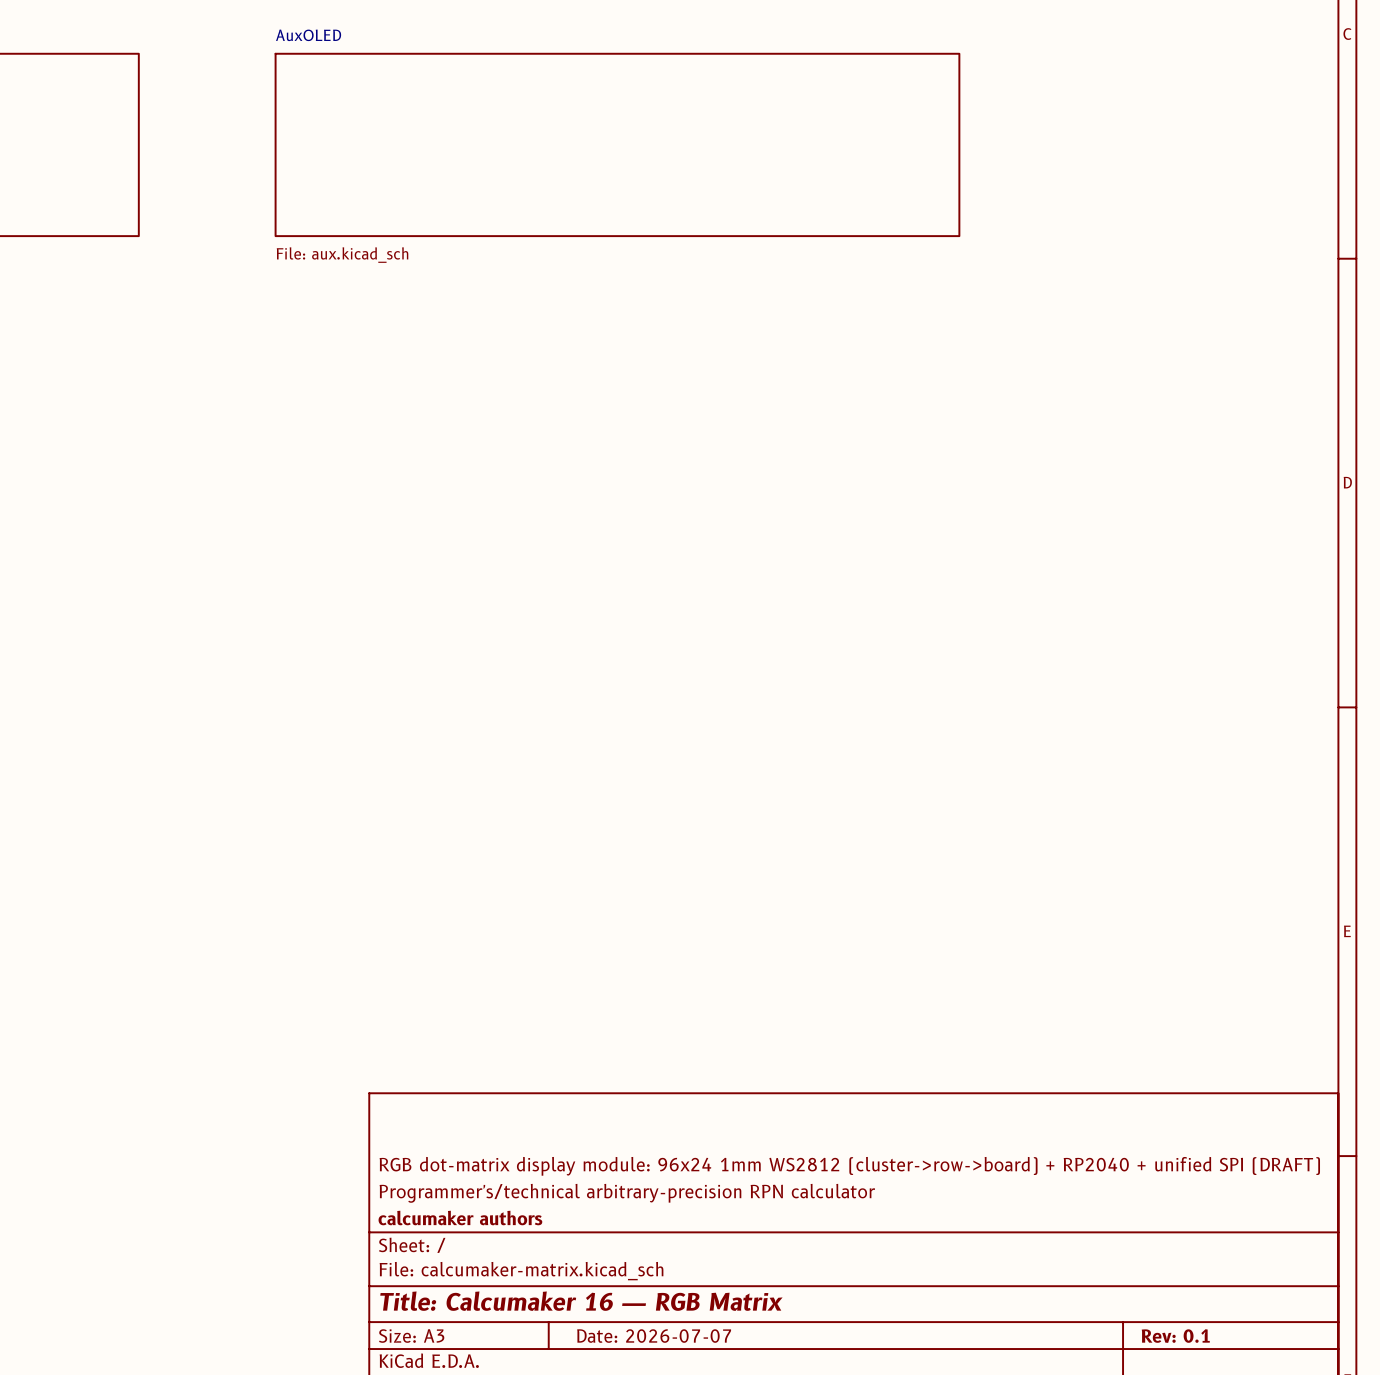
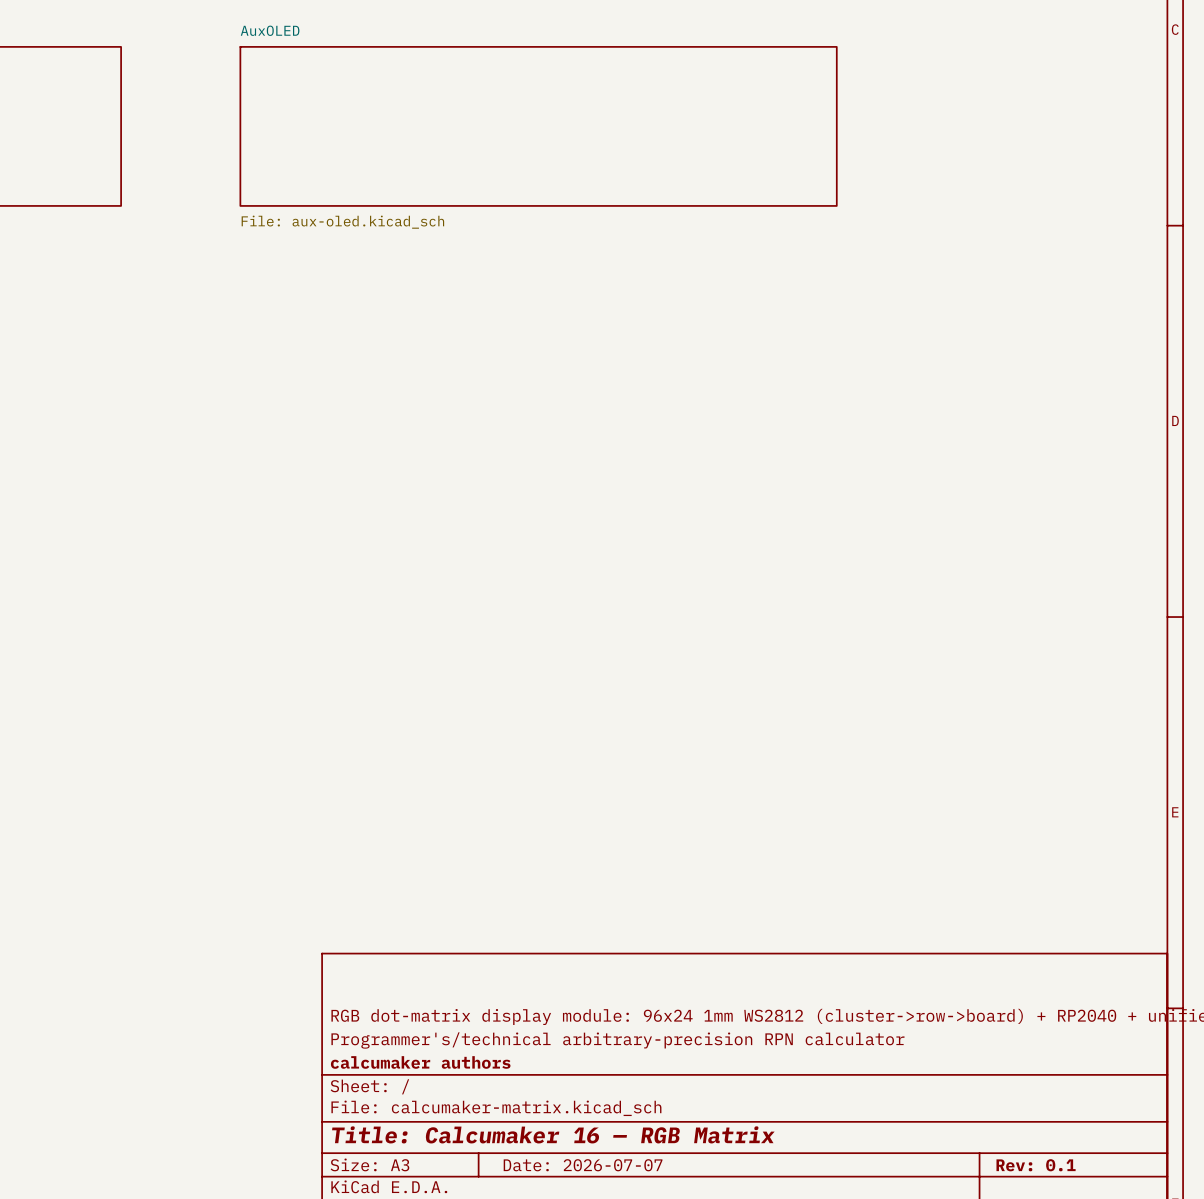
sheet AuxOLED value: File: aux.kicad_sch (342, 255) -> File: aux-oled.kicad_sch (342, 222)

